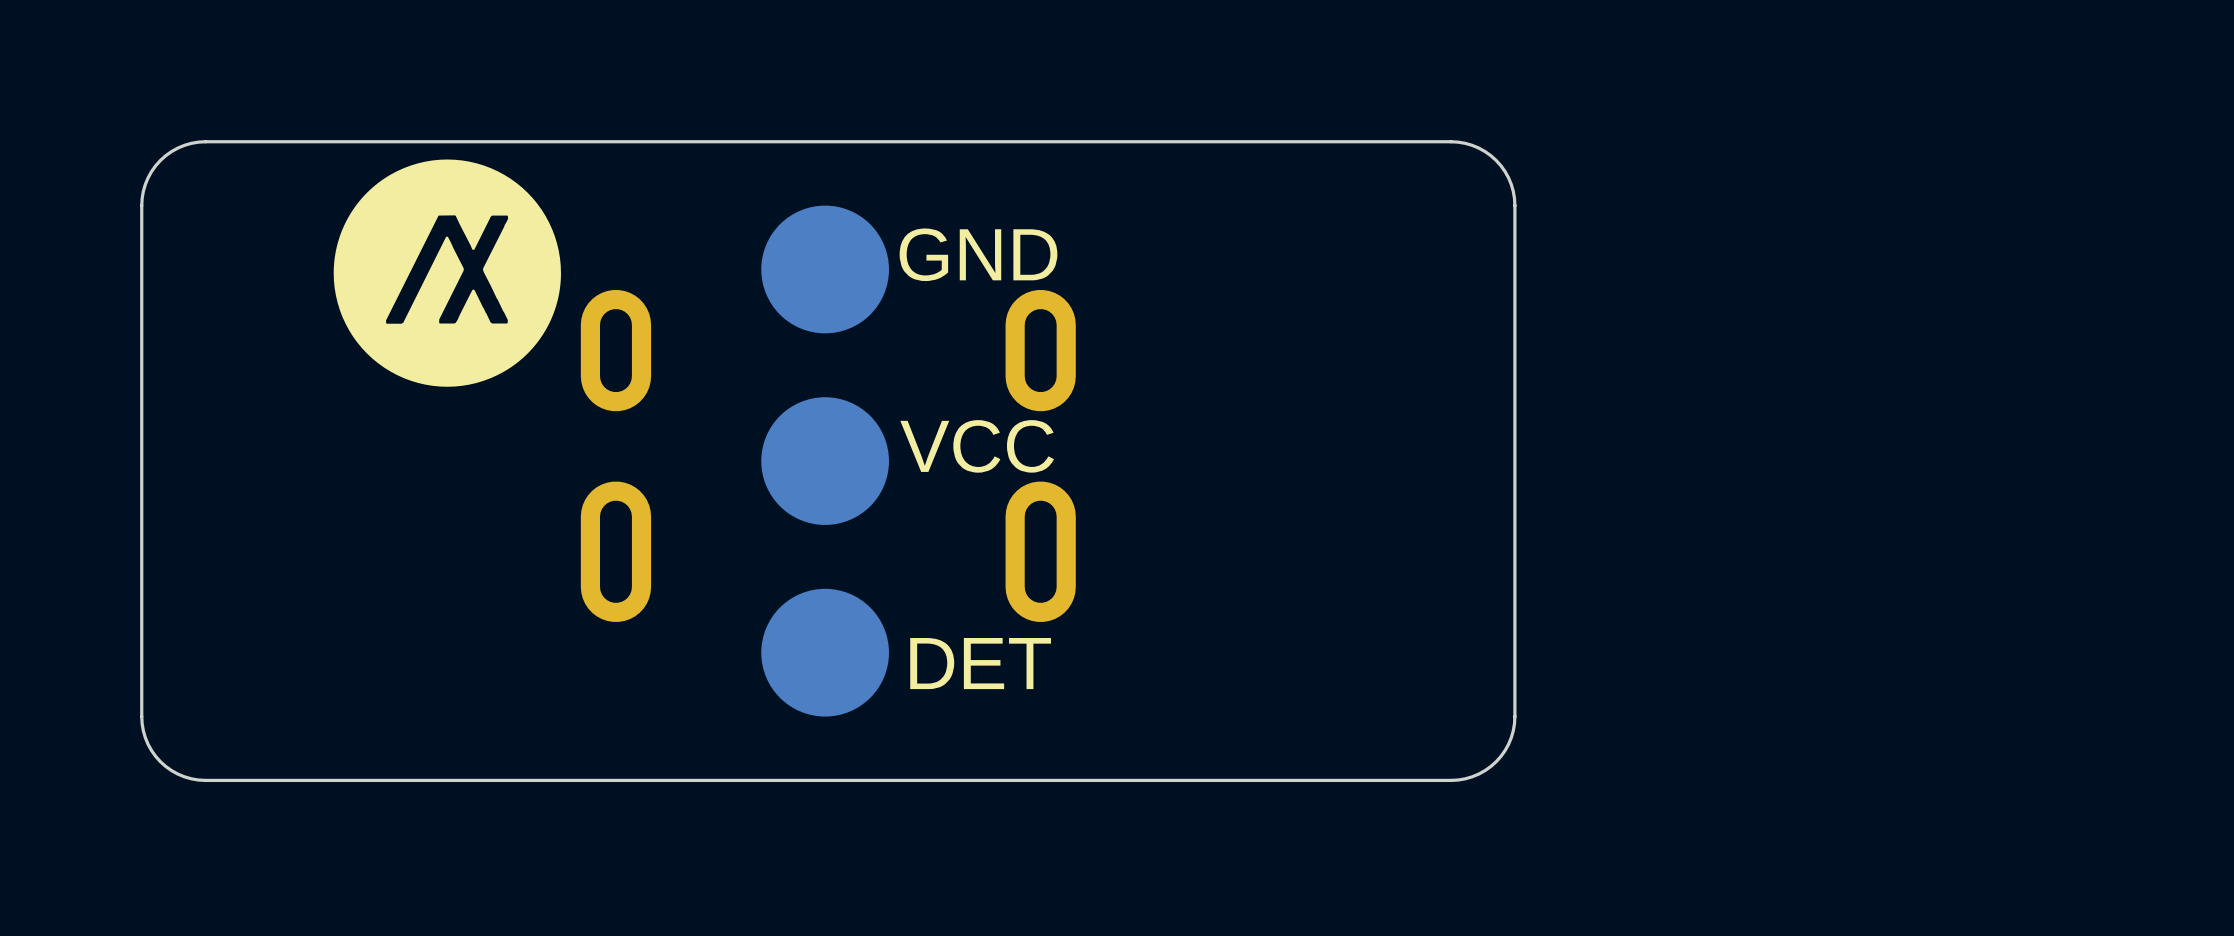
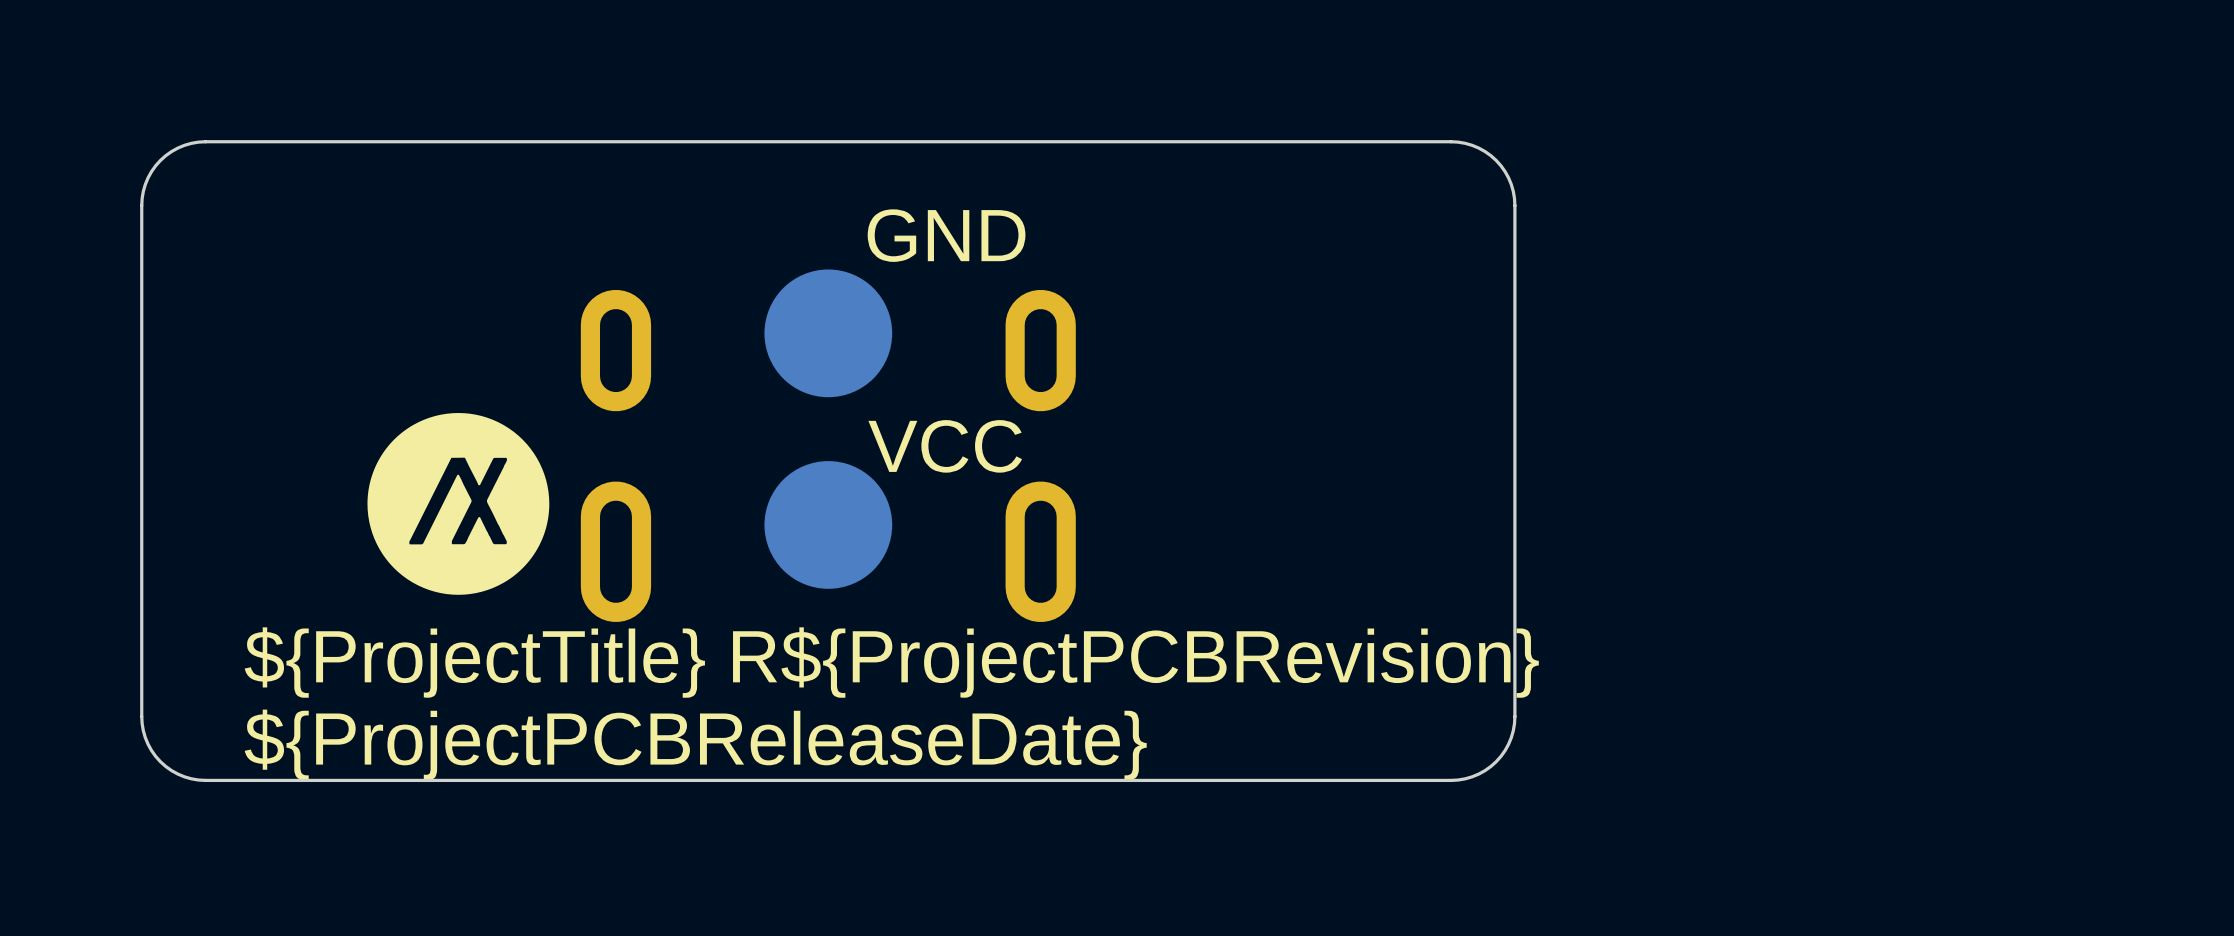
drawing: [333, 159, 561, 387] -> none
text position: GND (978, 254) -> GND (946, 235)
part: (825, 269) -> none
part: none -> (828, 333)
drawing: none -> [367, 412, 550, 595]
text position: VCC (977, 446) -> VCC (945, 446)
part: (825, 461) -> none
part: none -> (828, 524)
part: (825, 652) -> none
text: none -> ${ProjectTitle} R${ProjectPCBRevision} (891, 662)
text: DET (980, 663) -> none
text: none -> ${ProjectPCBReleaseDate} (695, 744)

